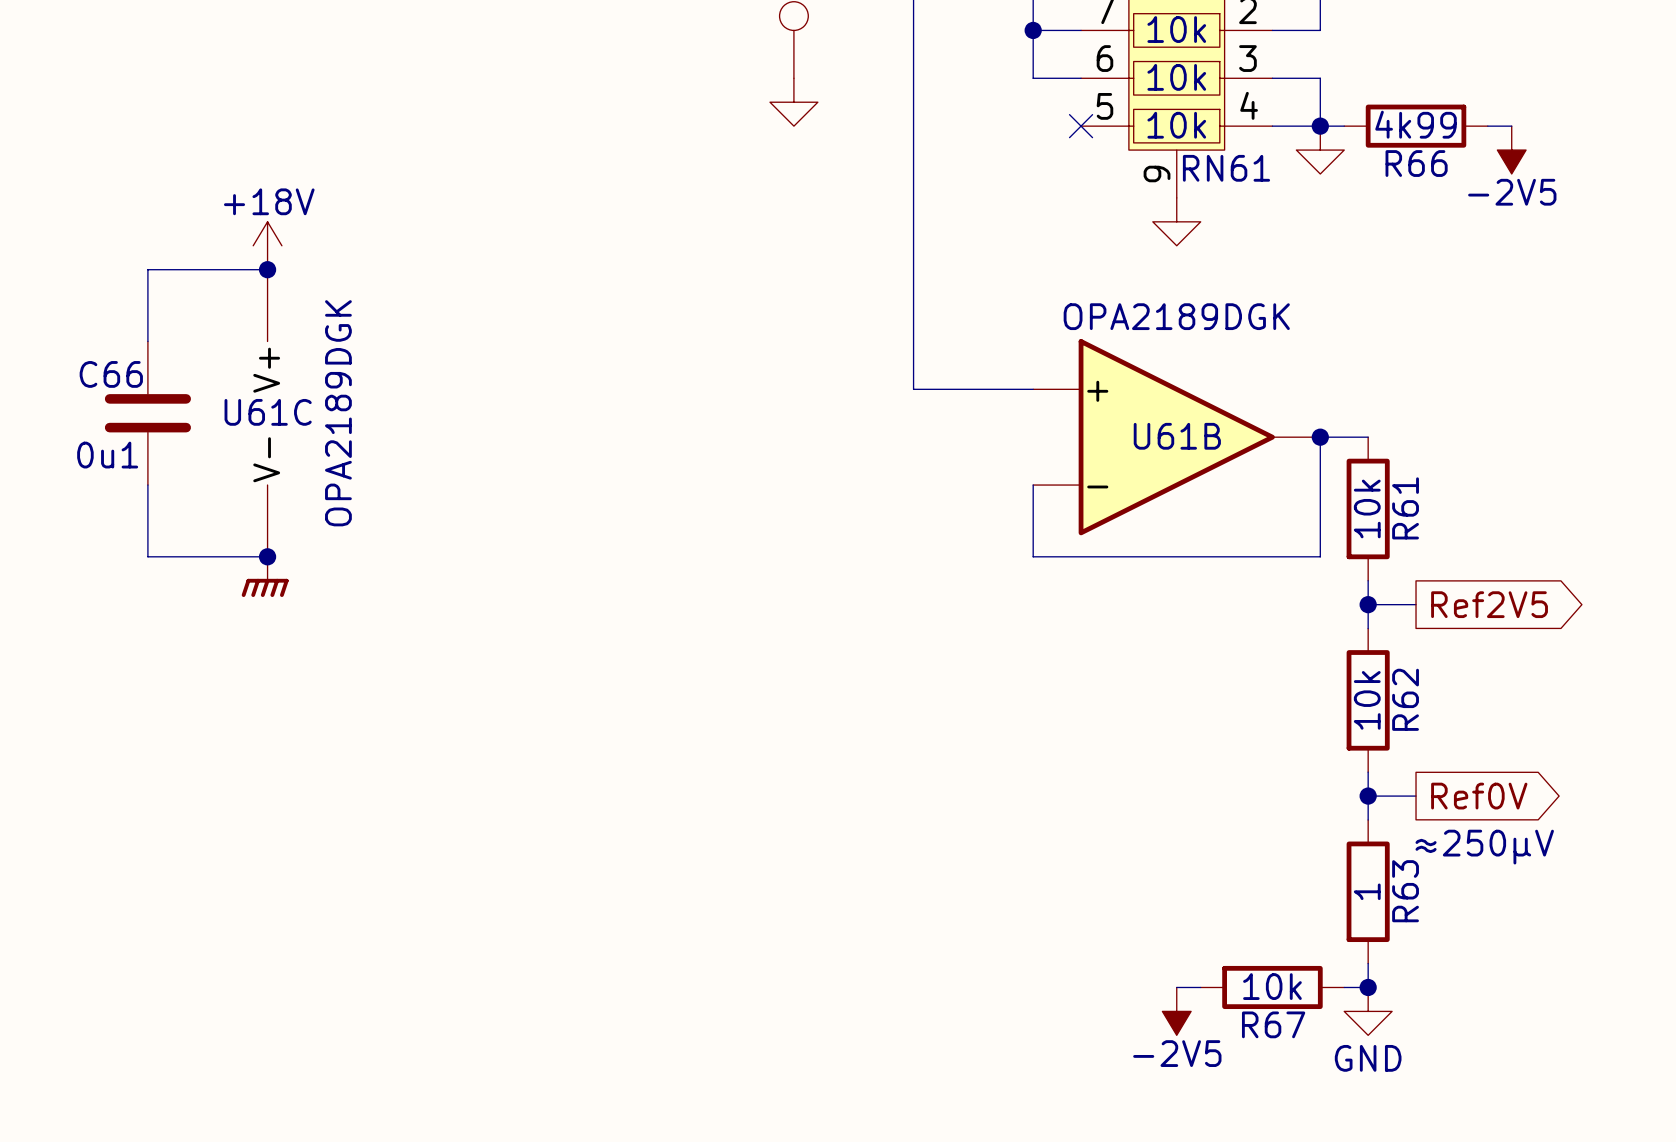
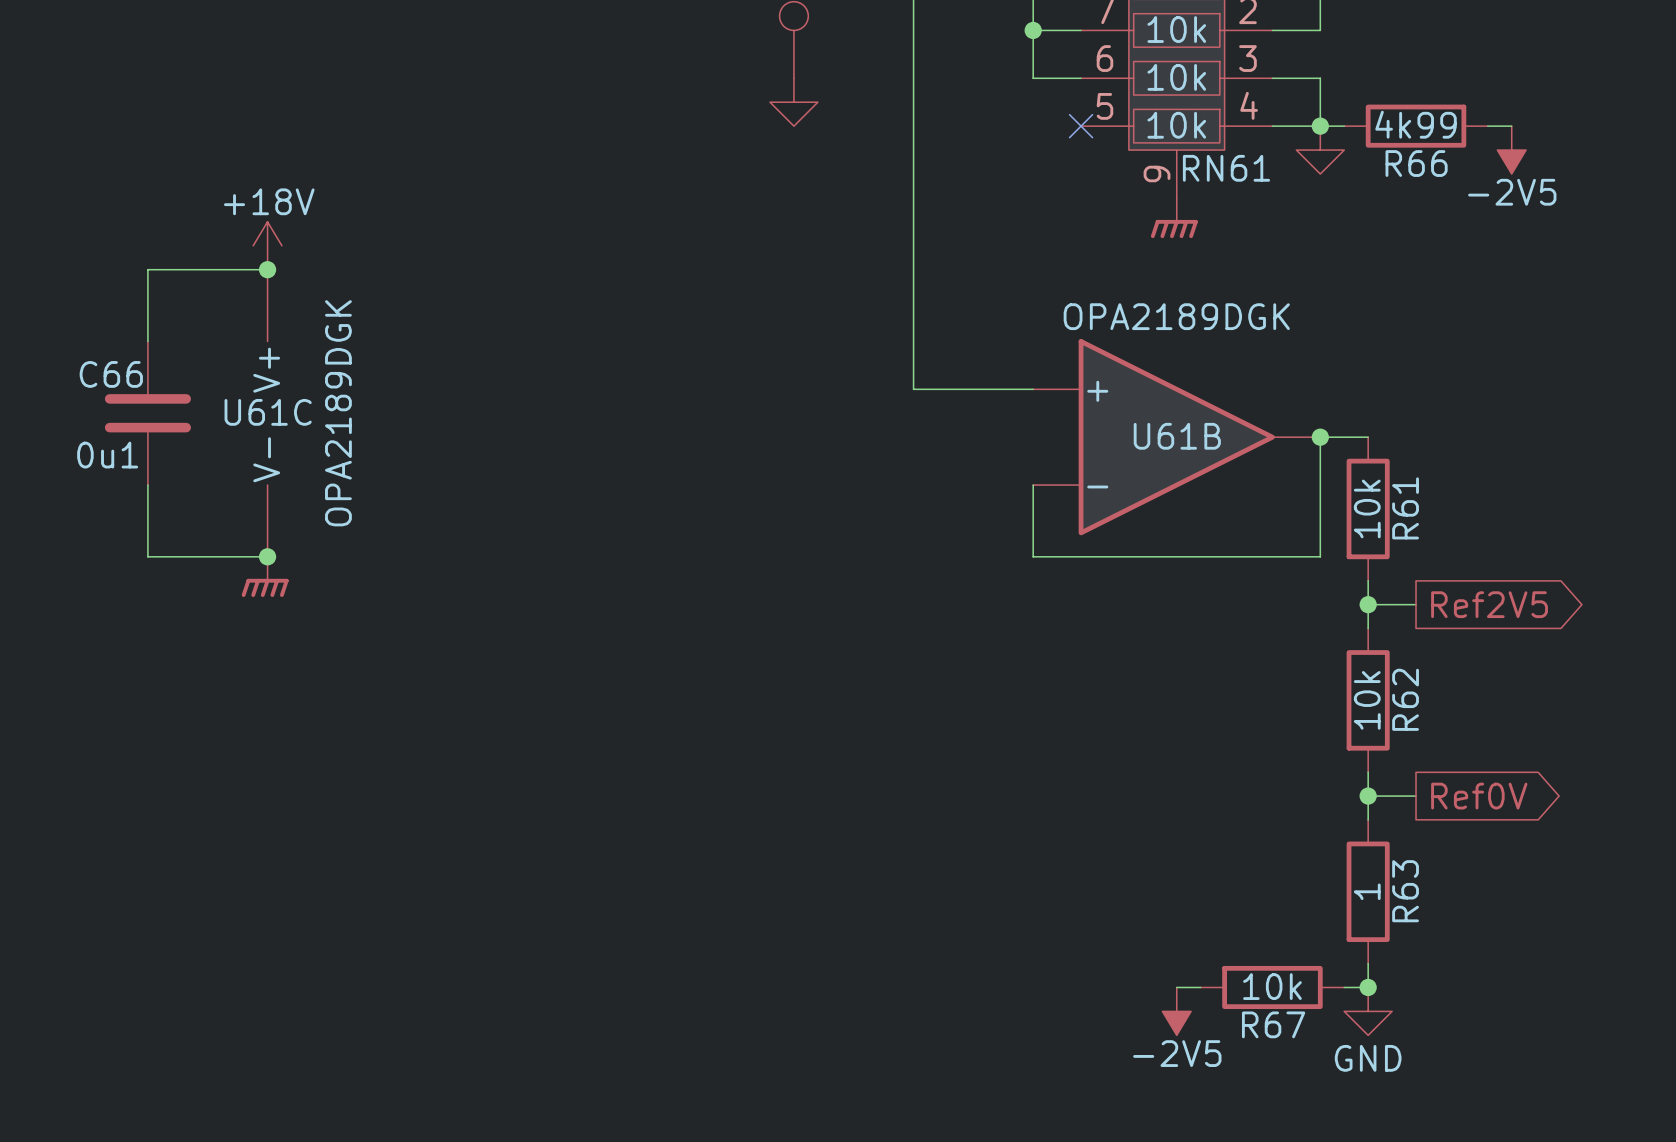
power symbol shape: [1152, 197, 1201, 246] -> [1150, 197, 1198, 239]
text: ≈250µV (1484, 847) -> none

